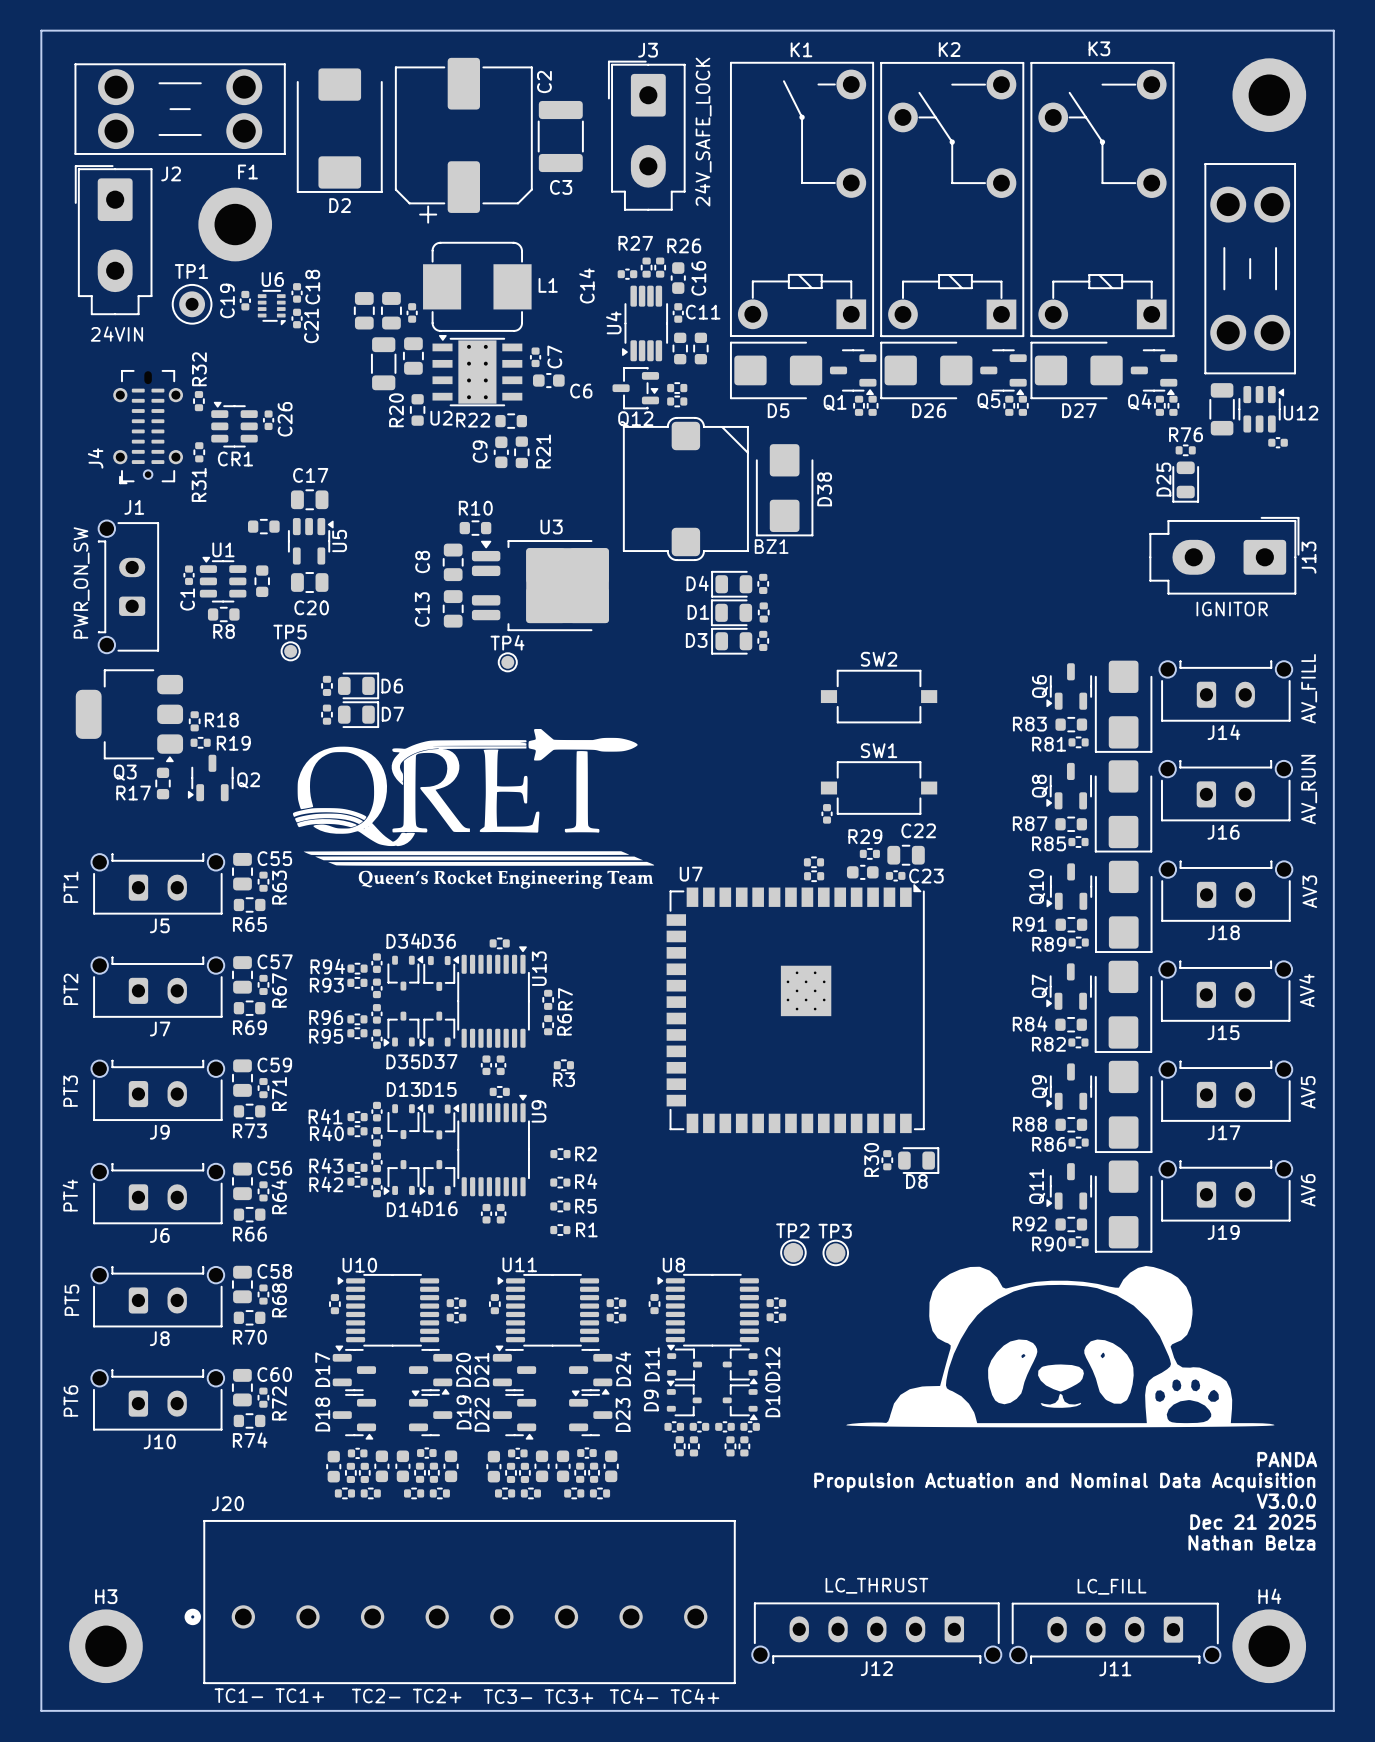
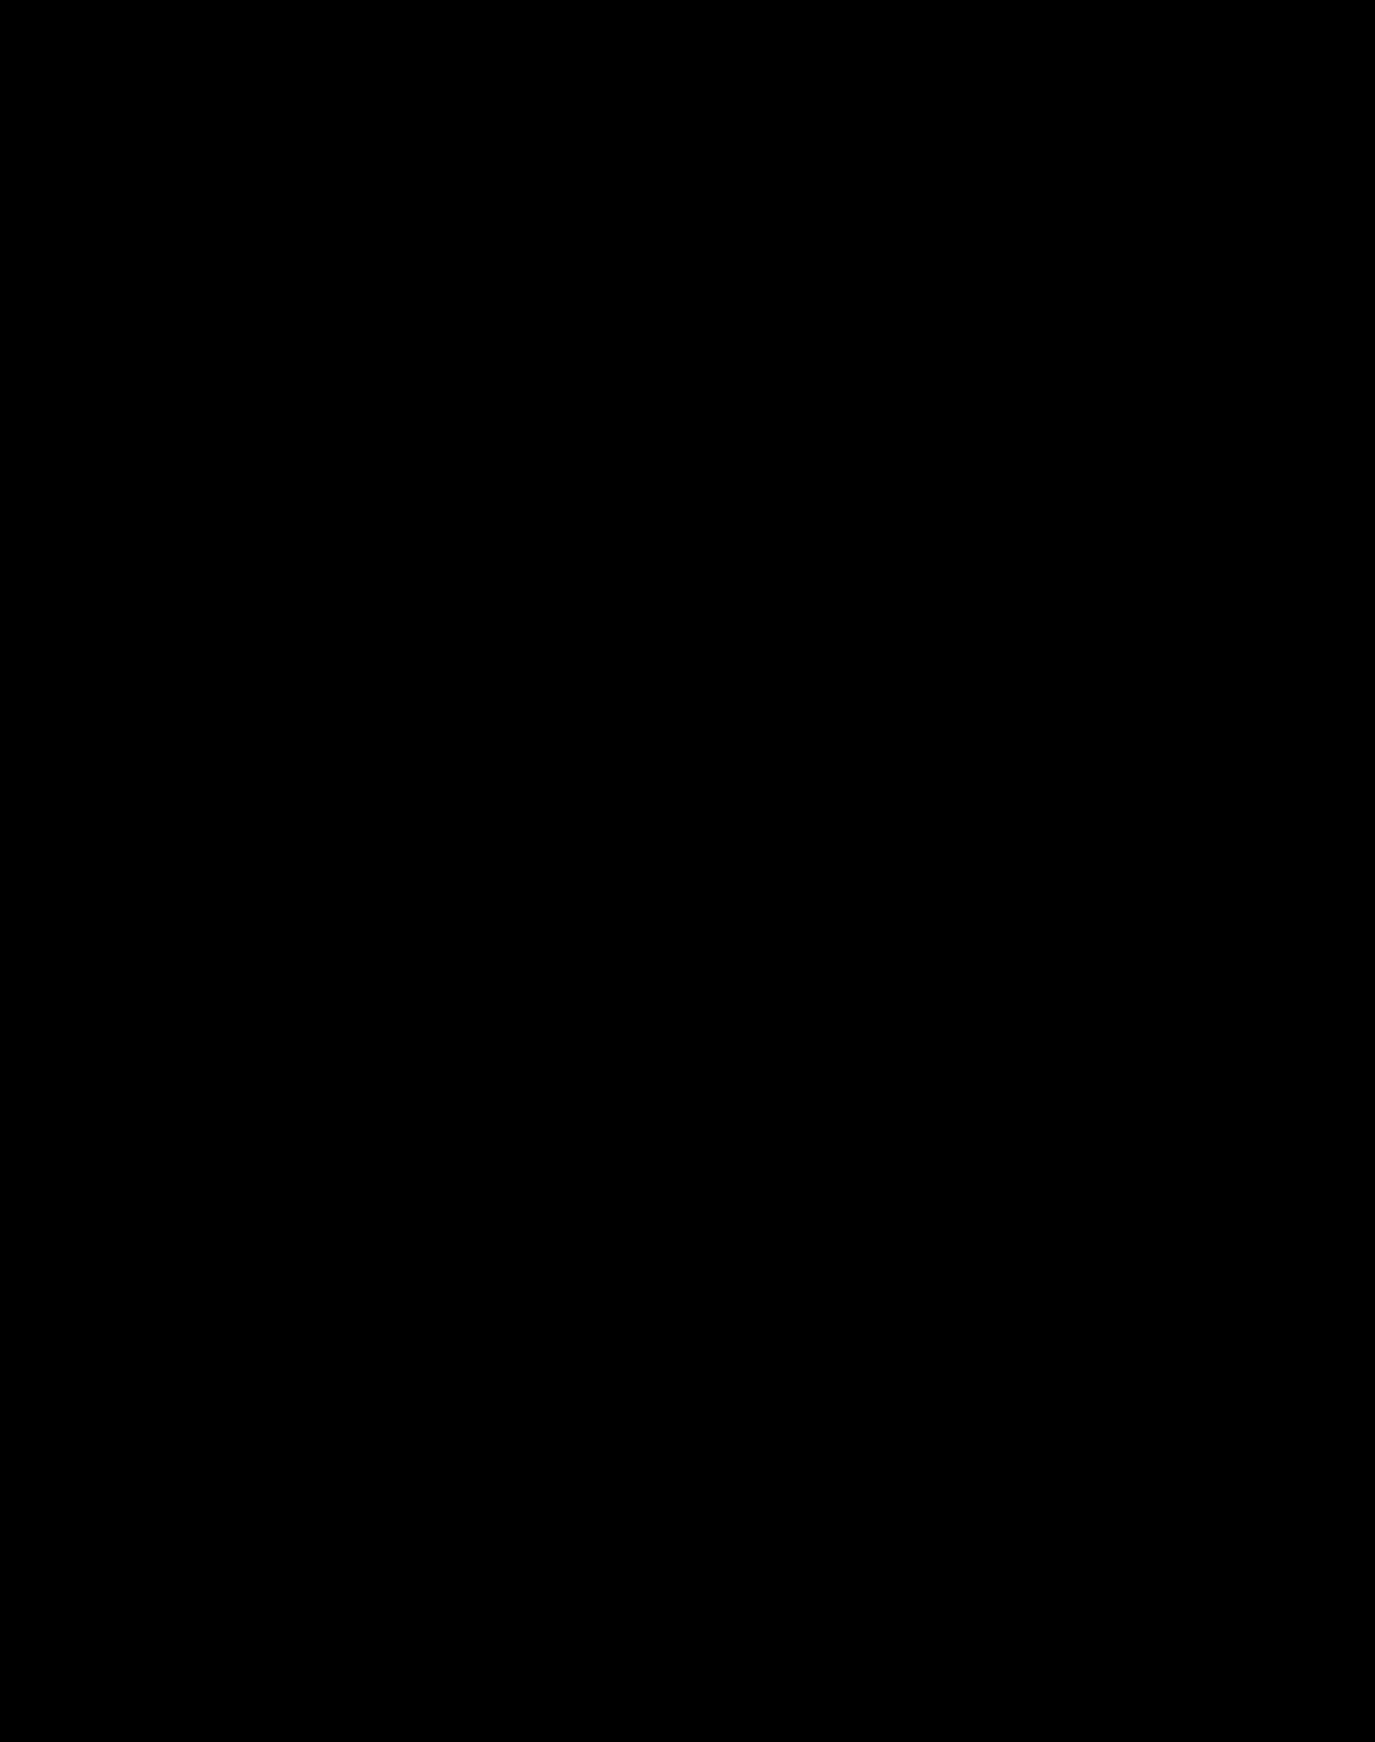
board edge: (41, 30) (1333, 30) (1333, 1710) (41, 1710) (41, 30) -> none
part: (1269, 95) -> none
F1: (180, 109) -> none
D2: (339, 130) -> none
text: 24V_SAFE_LOCK (703, 132) -> none
J3: (646, 135) -> none
C3: (560, 136) -> none
C2: (463, 140) -> none
K1: (802, 199) -> none
K2: (952, 199) -> none
K3: (1102, 199) -> none
part: (235, 224) -> none
J2: (113, 240) -> none
R27: (646, 267) -> none
R26: (660, 267) -> none
part: (1250, 268) -> none
C14: (627, 274) -> none
C16: (678, 278) -> none
L1: (477, 286) -> none
C18: (297, 292) -> none
C19: (245, 300) -> none
TP1: (192, 304) -> none
U6: (271, 307) -> none
part: (364, 310) -> none
part: (391, 310) -> none
part: (412, 312) -> none
C11: (678, 312) -> none
C21: (297, 318) -> none
U4: (644, 323) -> none
text: 24VIN (116, 334) -> none
part: (680, 348) -> none
part: (700, 348) -> none
part: (413, 355) -> none
C7: (535, 357) -> none
part: (383, 363) -> none
U2: (477, 370) -> none
D5: (776, 370) -> none
D26: (926, 370) -> none
D27: (1076, 370) -> none
Q1: (853, 372) -> none
Q5: (1003, 372) -> none
Q4: (1154, 372) -> none
C6: (548, 380) -> none
Q12: (635, 388) -> none
part: (677, 388) -> none
R32: (198, 401) -> none
part: (677, 401) -> none
part: (859, 405) -> none
part: (872, 405) -> none
part: (1009, 405) -> none
part: (1022, 405) -> none
part: (1159, 405) -> none
part: (1173, 405) -> none
R20: (417, 409) -> none
part: (1222, 409) -> none
U12: (1261, 409) -> none
C26: (268, 420) -> none
R22: (511, 421) -> none
CR1: (234, 424) -> none
J4: (148, 427) -> none
part: (1278, 442) -> none
R76: (1185, 450) -> none
R31: (199, 452) -> none
C9: (501, 452) -> none
R21: (521, 452) -> none
D25: (1185, 481) -> none
BZ1: (685, 488) -> none
D38: (784, 490) -> none
C17: (309, 499) -> none
part: (263, 526) -> none
R10: (475, 528) -> none
U5: (310, 541) -> none
J13: (1224, 555) -> none
C8: (453, 562) -> none
C1: (189, 575) -> none
U1: (223, 579) -> none
part: (262, 581) -> none
text: PWR_ON_SW (81, 582) -> none
C20: (309, 582) -> none
part: (763, 583) -> none
D4: (731, 584) -> none
U3: (540, 585) -> none
J1: (128, 586) -> none
C13: (453, 608) -> none
text: IGNITOR (1232, 609) -> none
D1: (731, 612) -> none
part: (763, 612) -> none
R8: (223, 614) -> none
part: (763, 640) -> none
D3: (731, 641) -> none
TP5: (290, 651) -> none
TP4: (507, 662) -> none
part: (327, 685) -> none
D6: (358, 685) -> none
Q6: (1069, 686) -> none
text: AV_FILL (1309, 688) -> none
J14: (1225, 691) -> none
SW2: (879, 696) -> none
part: (1123, 706) -> none
part: (327, 714) -> none
D7: (358, 714) -> none
Q3: (129, 715) -> none
R18: (194, 721) -> none
R83: (1071, 724) -> none
drawing: [292, 728, 655, 890] -> none
R19: (200, 742) -> none
R81: (1078, 742) -> none
Q2: (210, 777) -> none
R17: (163, 783) -> none
Q8: (1069, 786) -> none
SW1: (879, 788) -> none
text: AV_RUN (1309, 789) -> none
J16: (1225, 790) -> none
part: (1123, 806) -> none
part: (827, 813) -> none
R87: (1071, 824) -> none
R85: (1078, 842) -> none
R29: (869, 853) -> none
C22: (906, 855) -> none
part: (813, 862) -> none
C55: (242, 871) -> none
part: (862, 872) -> none
C23: (895, 875) -> none
part: (814, 876) -> none
R63: (263, 881) -> none
J5: (157, 883) -> none
Q10: (1069, 886) -> none
text: PT1 (70, 887) -> none
J18: (1225, 891) -> none
text: AV3 (1309, 891) -> none
R65: (249, 904) -> none
part: (1123, 906) -> none
R91: (1071, 924) -> none
R89: (1078, 942) -> none
part: (499, 943) -> none
part: (376, 963) -> none
R94: (357, 968) -> none
D34: (405, 973) -> none
D36: (441, 973) -> none
C57: (242, 974) -> none
R93: (357, 982) -> none
R67: (263, 984) -> none
Q7: (1068, 986) -> none
J7: (157, 987) -> none
part: (376, 988) -> none
text: PT2 (70, 989) -> none
text: AV4 (1306, 990) -> none
J15: (1225, 991) -> none
U13: (493, 997) -> none
R7: (548, 999) -> none
part: (1123, 1006) -> none
R69: (249, 1008) -> none
U7: (795, 1008) -> none
part: (376, 1013) -> none
R96: (357, 1019) -> none
R84: (1071, 1024) -> none
R6: (548, 1025) -> none
D35: (401, 1029) -> none
D37: (437, 1029) -> none
R95: (357, 1033) -> none
part: (376, 1039) -> none
R82: (1078, 1042) -> none
part: (486, 1065) -> none
part: (500, 1065) -> none
R3: (563, 1065) -> none
C59: (242, 1078) -> none
Q9: (1069, 1086) -> none
R71: (263, 1088) -> none
J9: (157, 1090) -> none
text: PT3 (70, 1091) -> none
part: (499, 1091) -> none
J17: (1225, 1091) -> none
text: AV5 (1308, 1092) -> none
part: (1123, 1106) -> none
R73: (249, 1111) -> none
part: (376, 1111) -> none
R41: (357, 1117) -> none
D13: (405, 1121) -> none
D15: (441, 1121) -> none
R88: (1071, 1124) -> none
R40: (357, 1131) -> none
part: (376, 1136) -> none
R86: (1078, 1142) -> none
U9: (493, 1145) -> none
R2: (560, 1154) -> none
R30: (887, 1160) -> none
D8: (918, 1160) -> none
part: (376, 1162) -> none
R43: (357, 1167) -> none
D14: (401, 1177) -> none
D16: (437, 1177) -> none
C56: (242, 1181) -> none
R42: (357, 1181) -> none
R4: (560, 1182) -> none
Q11: (1069, 1186) -> none
part: (376, 1187) -> none
J19: (1225, 1190) -> none
text: AV6 (1308, 1190) -> none
R64: (263, 1191) -> none
J6: (157, 1193) -> none
text: PT4 (70, 1195) -> none
R5: (560, 1206) -> none
part: (1123, 1206) -> none
part: (486, 1213) -> none
part: (500, 1213) -> none
R66: (249, 1214) -> none
R92: (1071, 1224) -> none
R1: (560, 1230) -> none
R90: (1078, 1242) -> none
TP2: (793, 1252) -> none
TP3: (835, 1252) -> none
drawing: [846, 1265, 1275, 1428] -> none
C58: (242, 1284) -> none
R68: (263, 1294) -> none
J8: (157, 1296) -> none
text: PT5 (71, 1300) -> none
part: (456, 1303) -> none
part: (616, 1303) -> none
part: (776, 1303) -> none
part: (334, 1304) -> none
part: (494, 1304) -> none
part: (654, 1304) -> none
U10: (388, 1310) -> none
U11: (548, 1310) -> none
U8: (708, 1310) -> none
R70: (249, 1317) -> none
part: (456, 1317) -> none
part: (616, 1317) -> none
part: (776, 1317) -> none
D11: (684, 1362) -> none
D12: (740, 1366) -> none
D17: (354, 1368) -> none
D21: (514, 1368) -> none
D20: (430, 1371) -> none
D24: (590, 1371) -> none
C60: (242, 1387) -> none
R72: (263, 1397) -> none
D9: (684, 1398) -> none
J10: (157, 1399) -> none
text: PT6 (70, 1401) -> none
D10: (740, 1402) -> none
D19: (430, 1413) -> none
D23: (590, 1413) -> none
D18: (354, 1416) -> none
D22: (514, 1416) -> none
R74: (249, 1420) -> none
part: (674, 1426) -> none
part: (699, 1426) -> none
part: (724, 1426) -> none
part: (750, 1426) -> none
part: (679, 1446) -> none
part: (693, 1446) -> none
part: (730, 1446) -> none
part: (744, 1446) -> none
part: (357, 1453) -> none
part: (426, 1453) -> none
part: (517, 1453) -> none
part: (586, 1453) -> none
text: PANDA (1287, 1459) -> none
part: (333, 1466) -> none
part: (381, 1466) -> none
part: (402, 1466) -> none
part: (451, 1466) -> none
part: (493, 1466) -> none
part: (542, 1466) -> none
part: (563, 1466) -> none
part: (611, 1466) -> none
part: (350, 1472) -> none
part: (364, 1472) -> none
part: (420, 1472) -> none
part: (433, 1472) -> none
part: (511, 1472) -> none
part: (524, 1472) -> none
part: (580, 1472) -> none
part: (594, 1472) -> none
text: Propulsion Actuation and Nominal Data Acquisition (1064, 1482) -> none
part: (344, 1493) -> none
part: (370, 1493) -> none
part: (414, 1493) -> none
part: (439, 1493) -> none
part: (505, 1493) -> none
part: (530, 1493) -> none
part: (574, 1493) -> none
part: (600, 1493) -> none
text: V3.0.0 (1286, 1501) -> none
text: Dec 21 2025 (1253, 1522) -> none
text: Nathan Belza (1251, 1542) -> none
text: LC_THRUST (876, 1585) -> none
text: LC_FILL (1112, 1586) -> none
J20: (460, 1602) -> none
J12: (876, 1633) -> none
J11: (1115, 1633) -> none
H3: (105, 1646) -> none
H4: (1269, 1646) -> none
text: TC1- TC1+ (269, 1695) -> none
text: TC2- TC2+ (406, 1696) -> none
text: TC3- TC3+ (538, 1696) -> none
text: TC4- TC4+ (664, 1696) -> none

